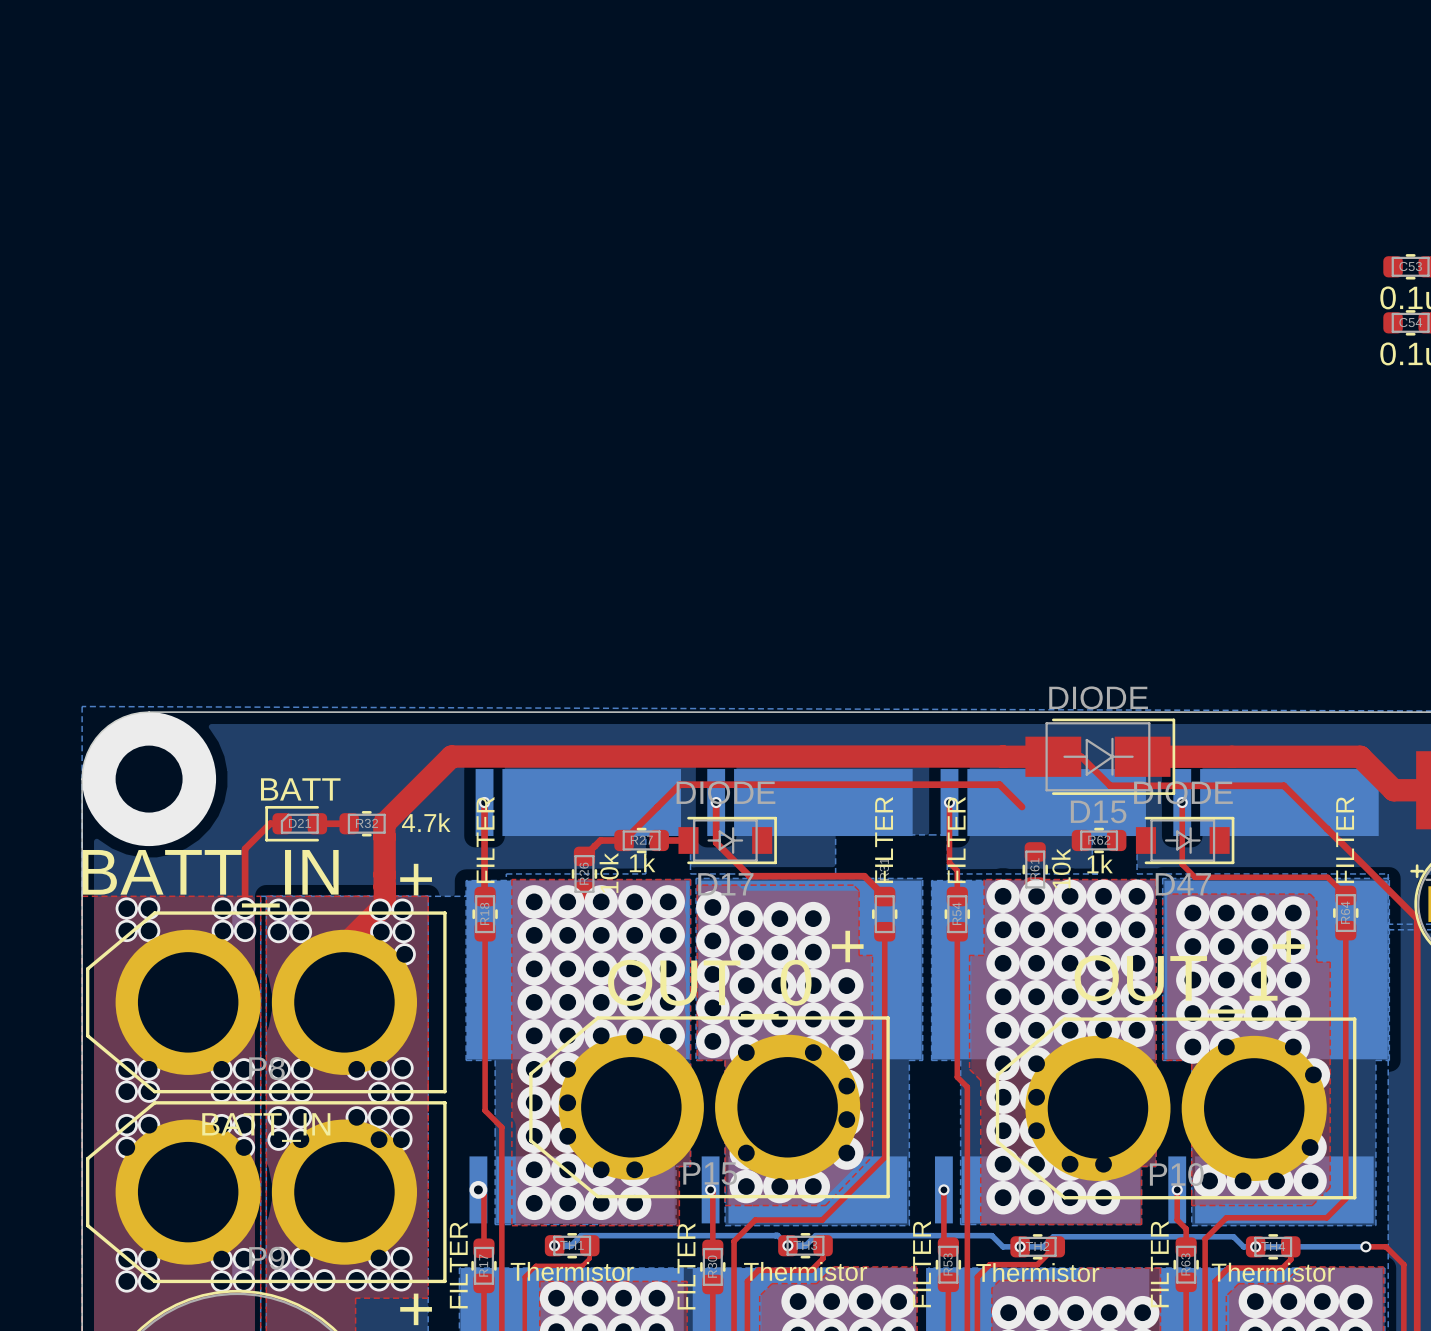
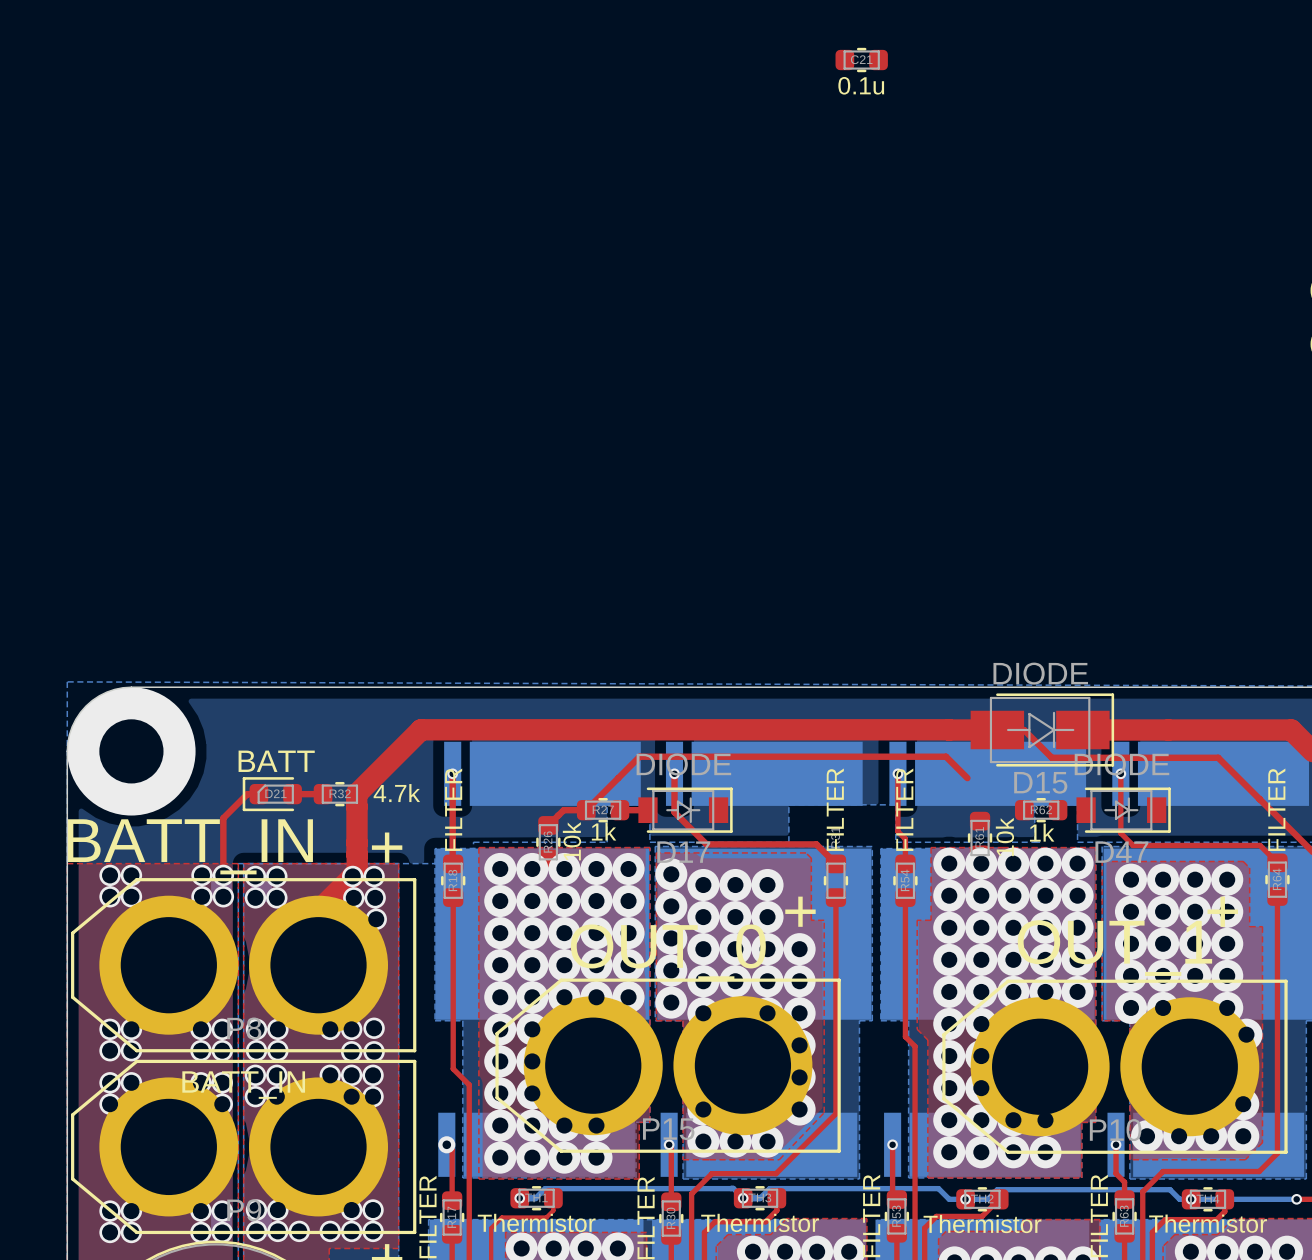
C21: none -> 0.1u (861, 60)

